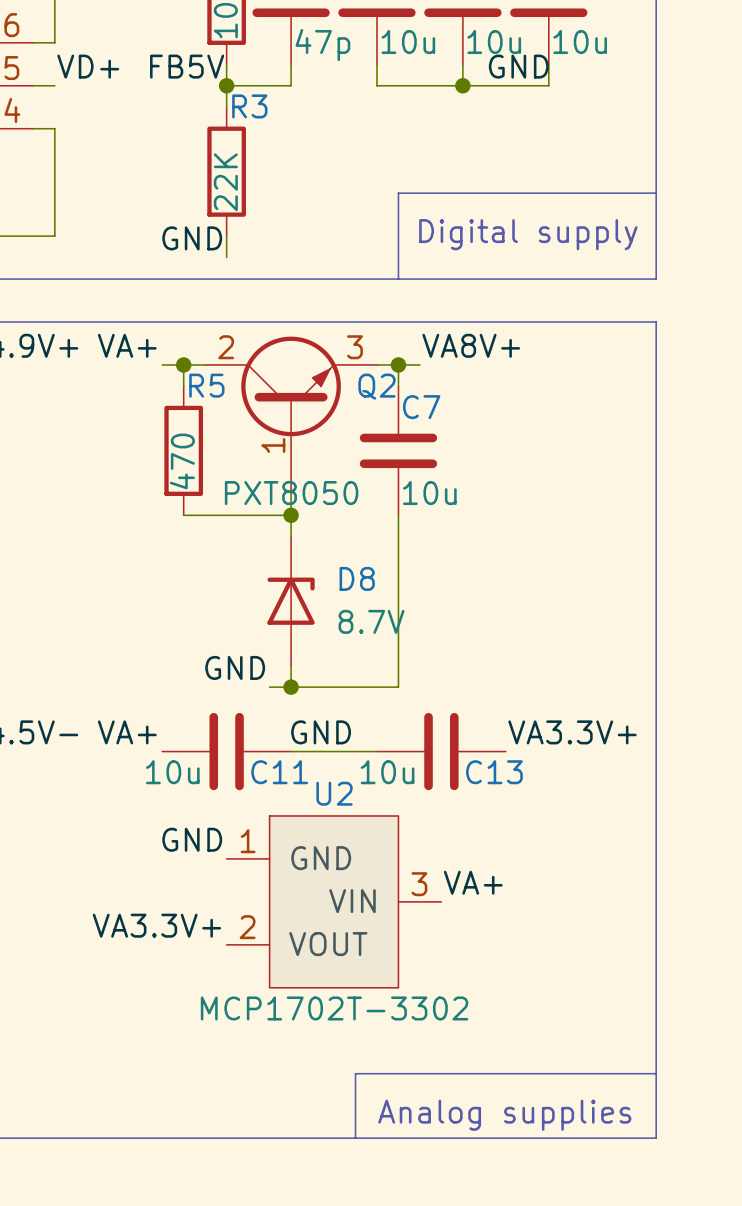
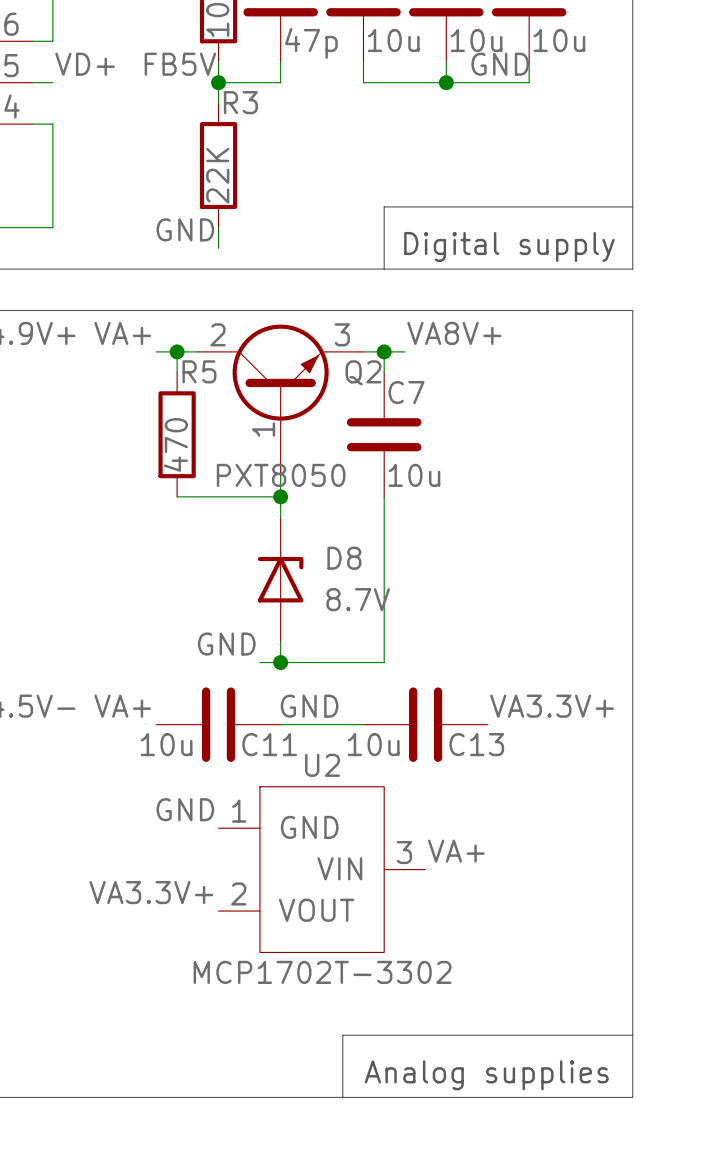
line: (656, 193) (398, 193) (398, 214) -> (632, 206) (384, 206)
text position: Digital supply (528, 234) -> Digital supply (509, 246)

